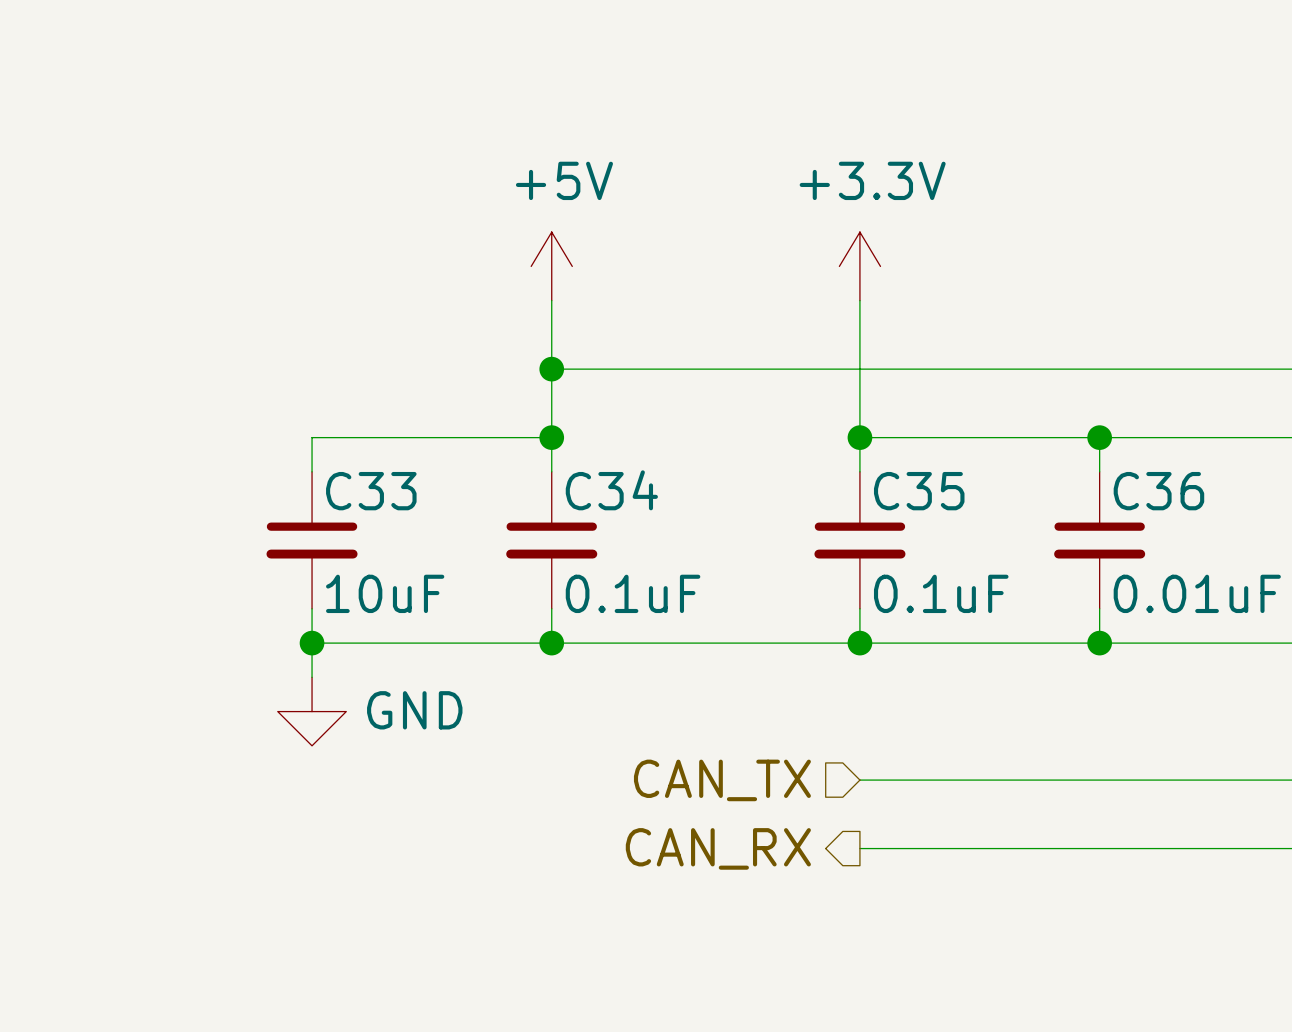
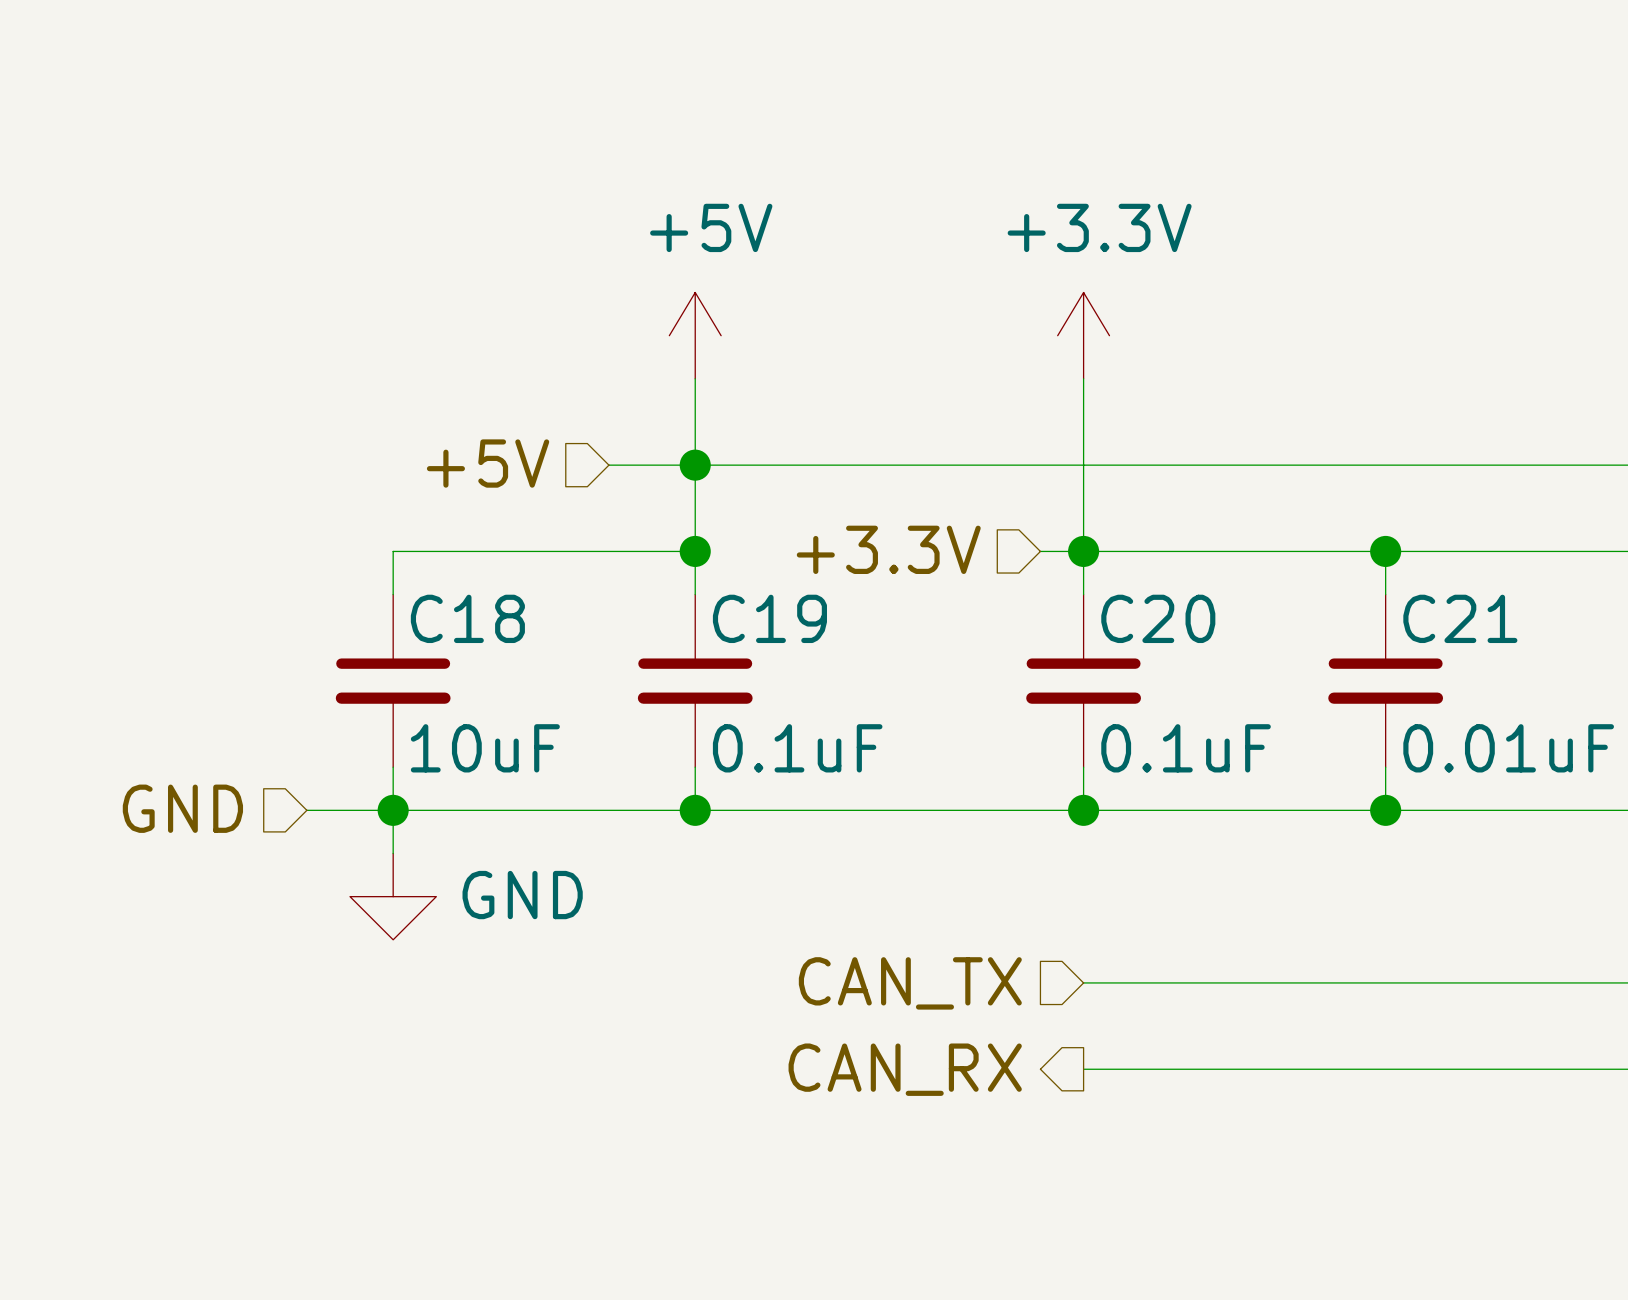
hierarchical label: none -> +5V (488, 463)
wire: none -> (608, 465) (695, 465)
hierarchical label: none -> +3.3V (888, 549)
wire: none -> (1040, 551) (1083, 551)
C34 name: C34 (611, 490) -> C19 (769, 618)
C33 name: C33 (371, 491) -> C18 (467, 618)
C35 name: C35 (919, 491) -> C20 (1158, 618)
C36 name: C36 (1158, 491) -> C21 (1460, 618)
hierarchical label: none -> GND (182, 808)
wire: none -> (306, 810) (393, 810)

